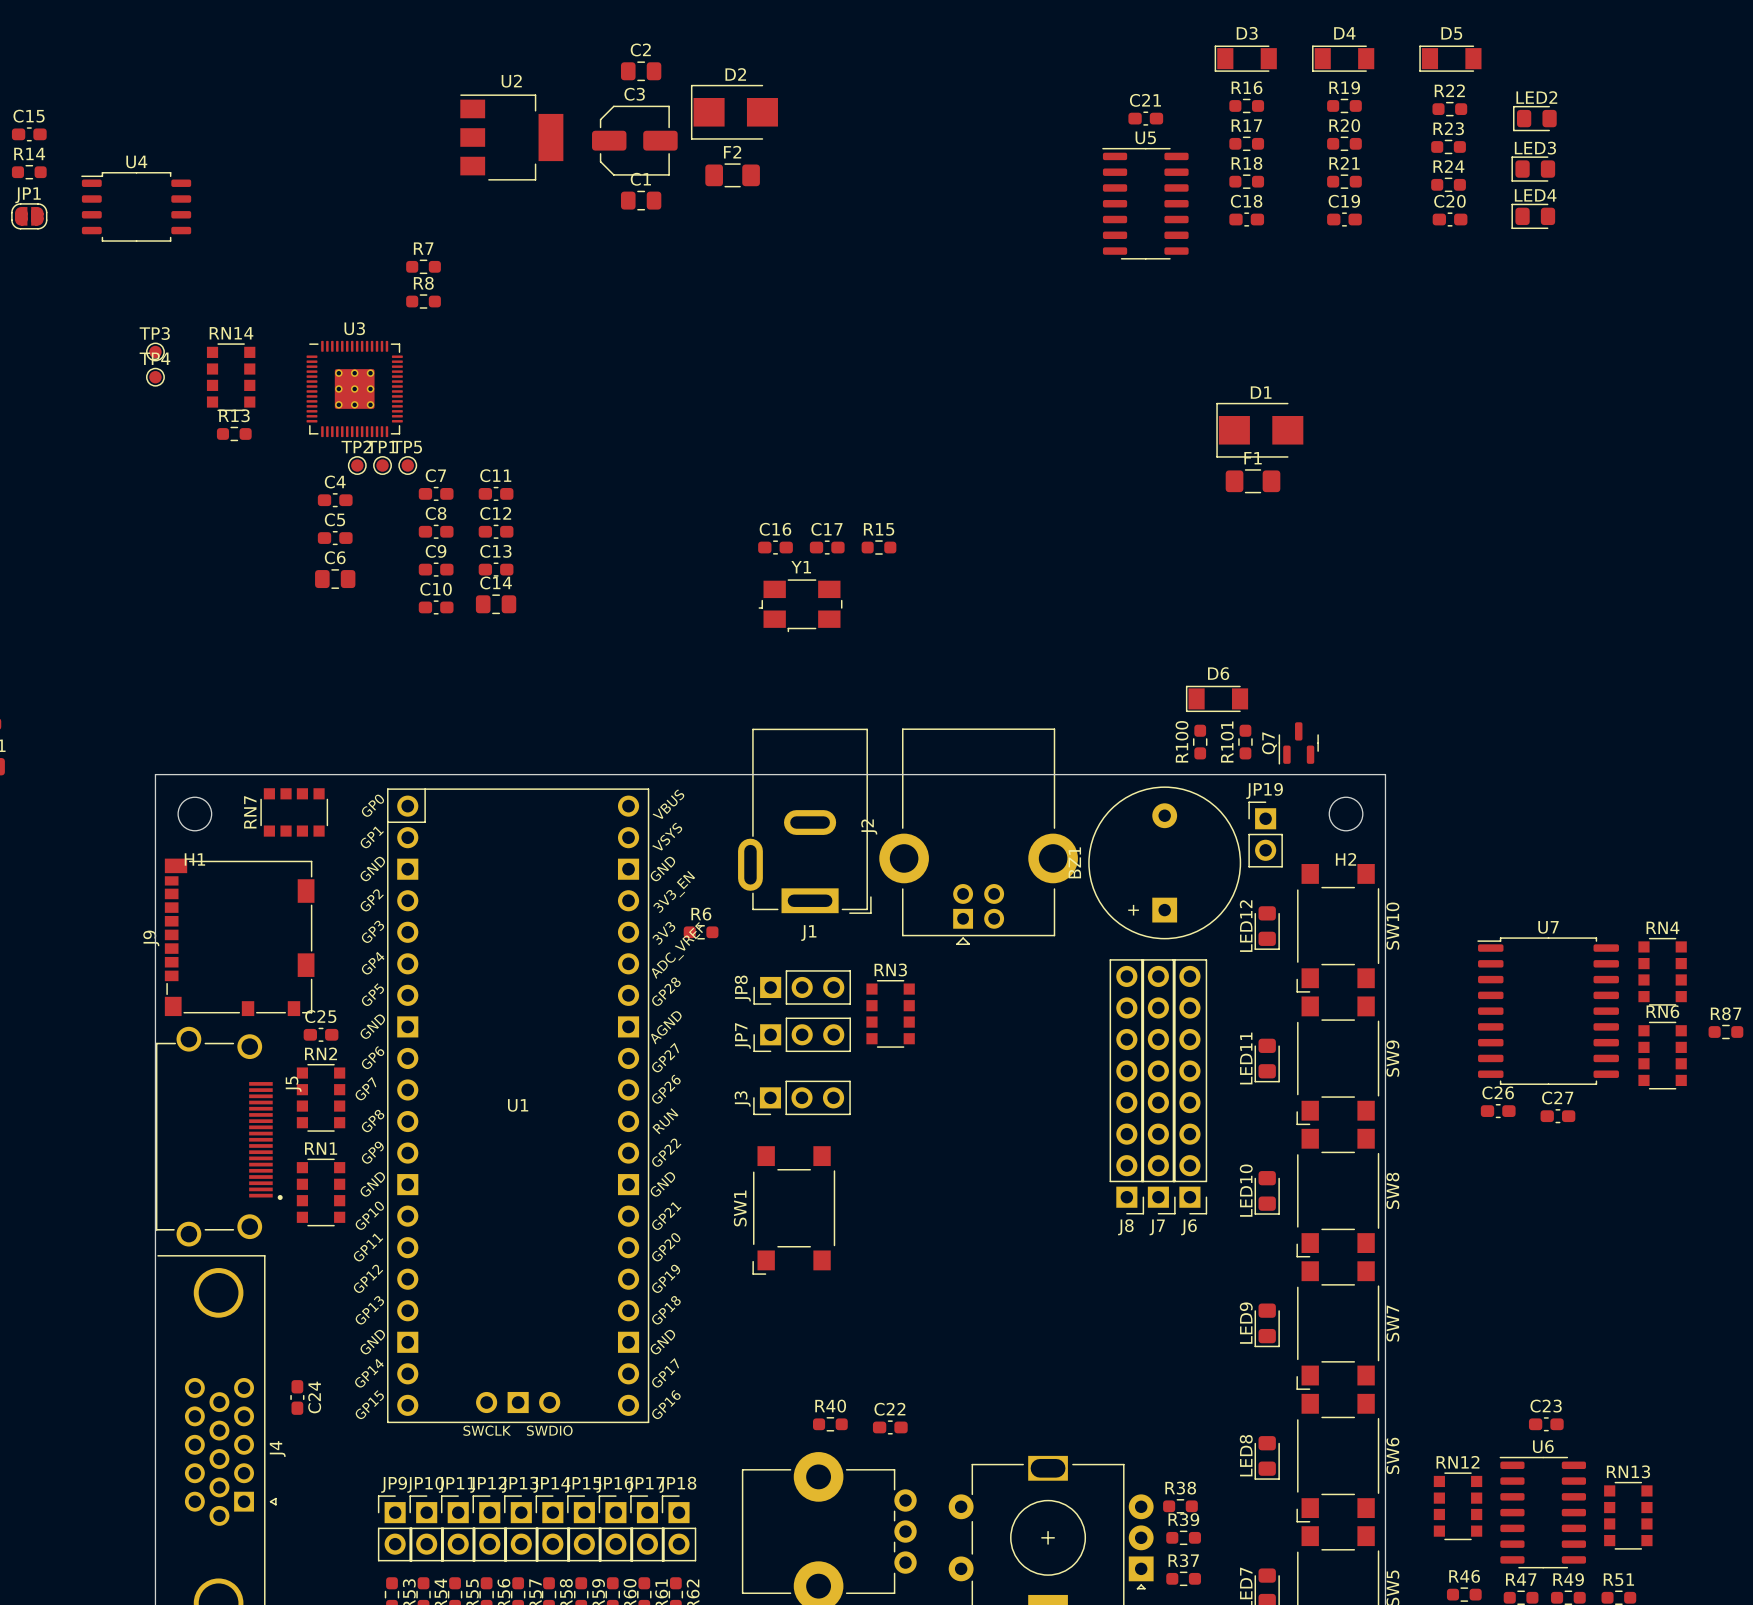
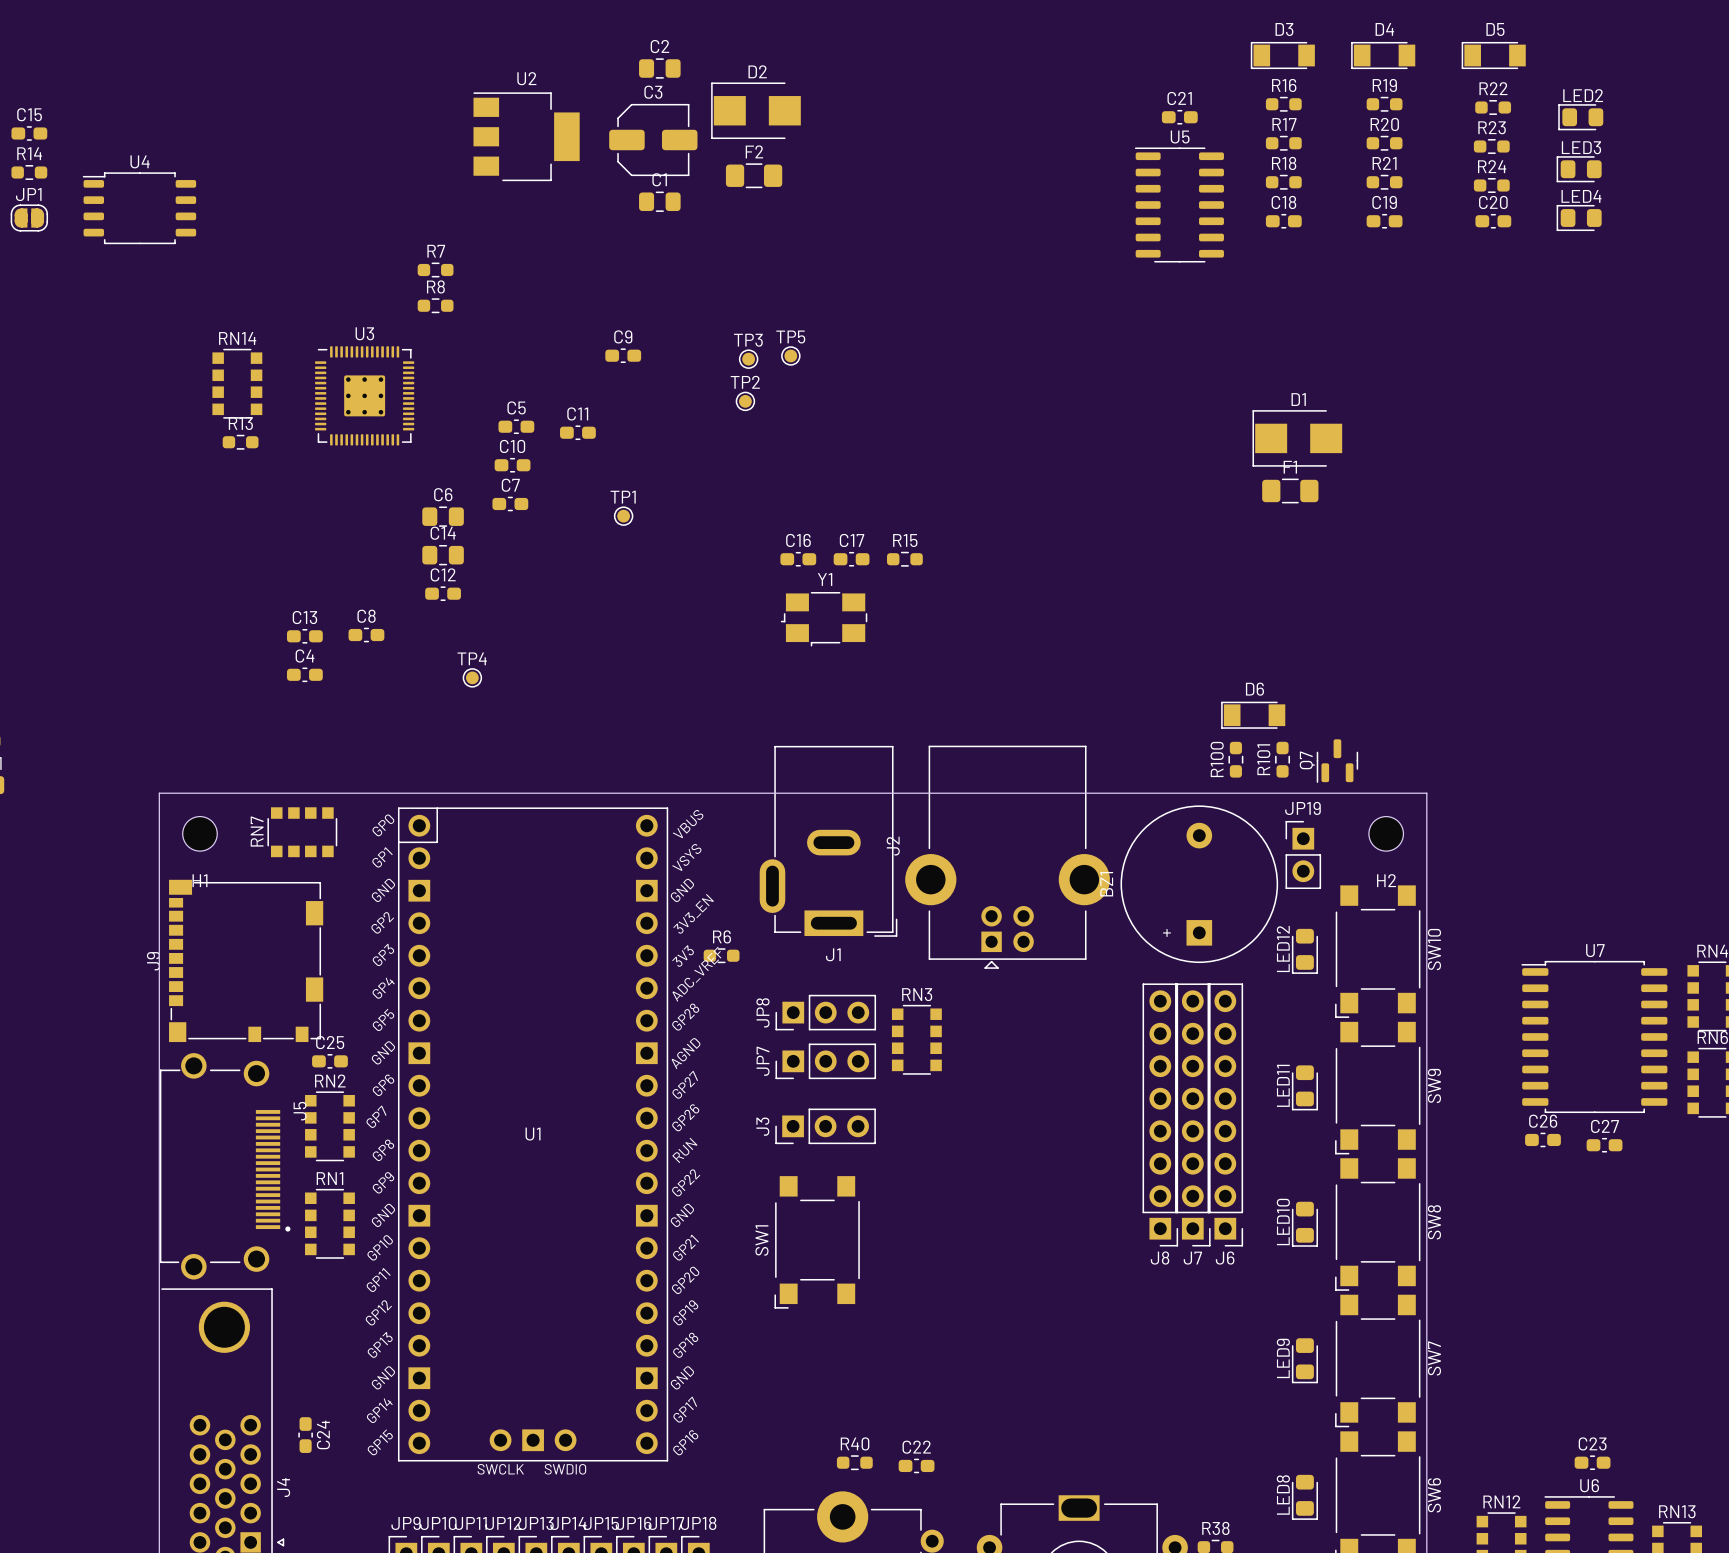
TP3 position: (155, 351) -> (748, 359)
TP4 position: (155, 377) -> (472, 677)
C11: none -> (577, 432)
TP2 position: (357, 465) -> (745, 401)
TP1 position: (382, 465) -> (623, 516)
TP5 position: (407, 465) -> (790, 355)
C11 name: C11 (495, 475) -> C7 (510, 485)
C7: (436, 493) -> none
C4 position: (335, 500) -> (304, 674)
C8 position: (436, 531) -> (366, 635)
C12 position: (496, 531) -> (443, 593)
C5 position: (335, 538) -> (516, 426)
C9 position: (436, 569) -> (623, 355)
C13 position: (496, 569) -> (304, 636)
C6 position: (335, 579) -> (443, 516)
C14 position: (496, 604) -> (443, 555)
C10 position: (436, 607) -> (512, 465)

